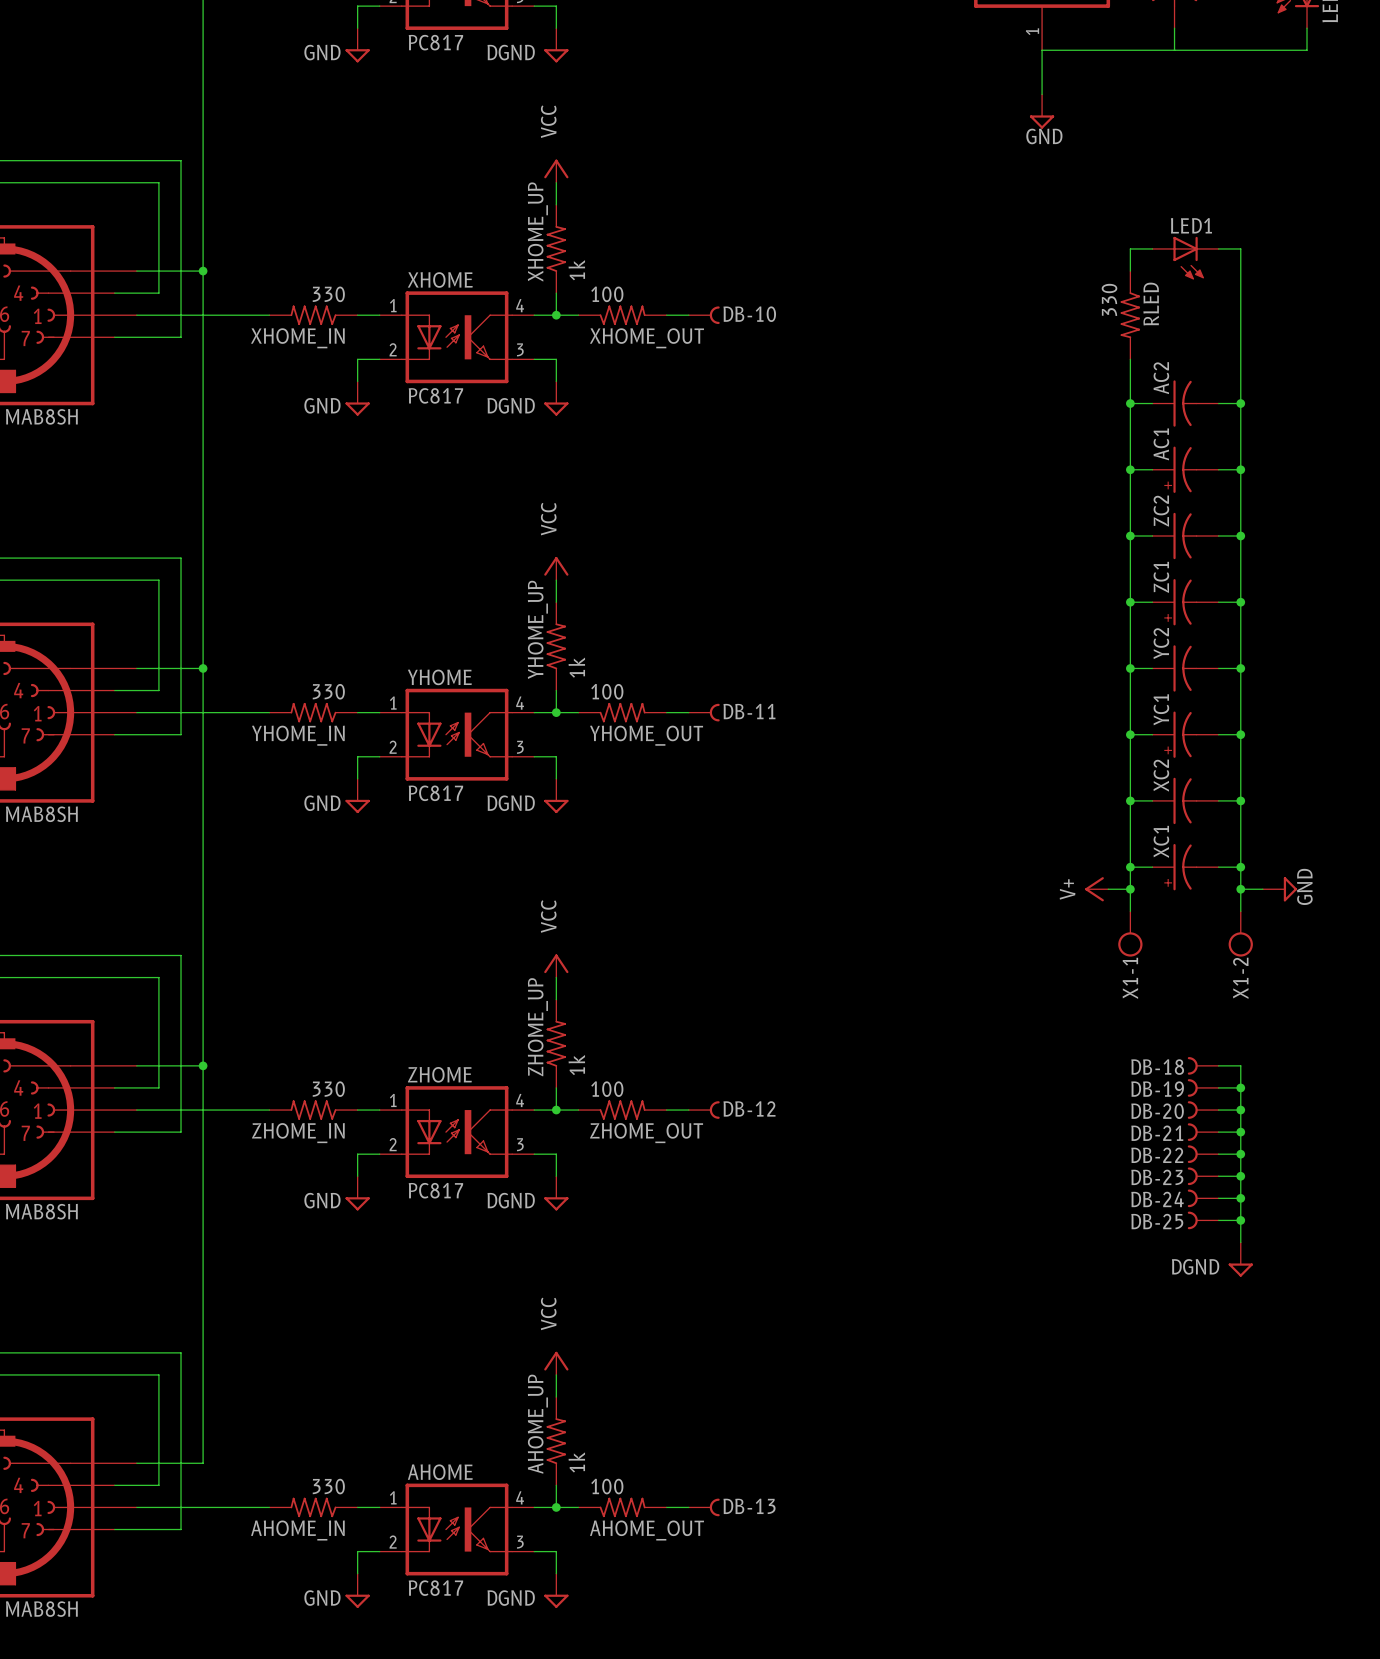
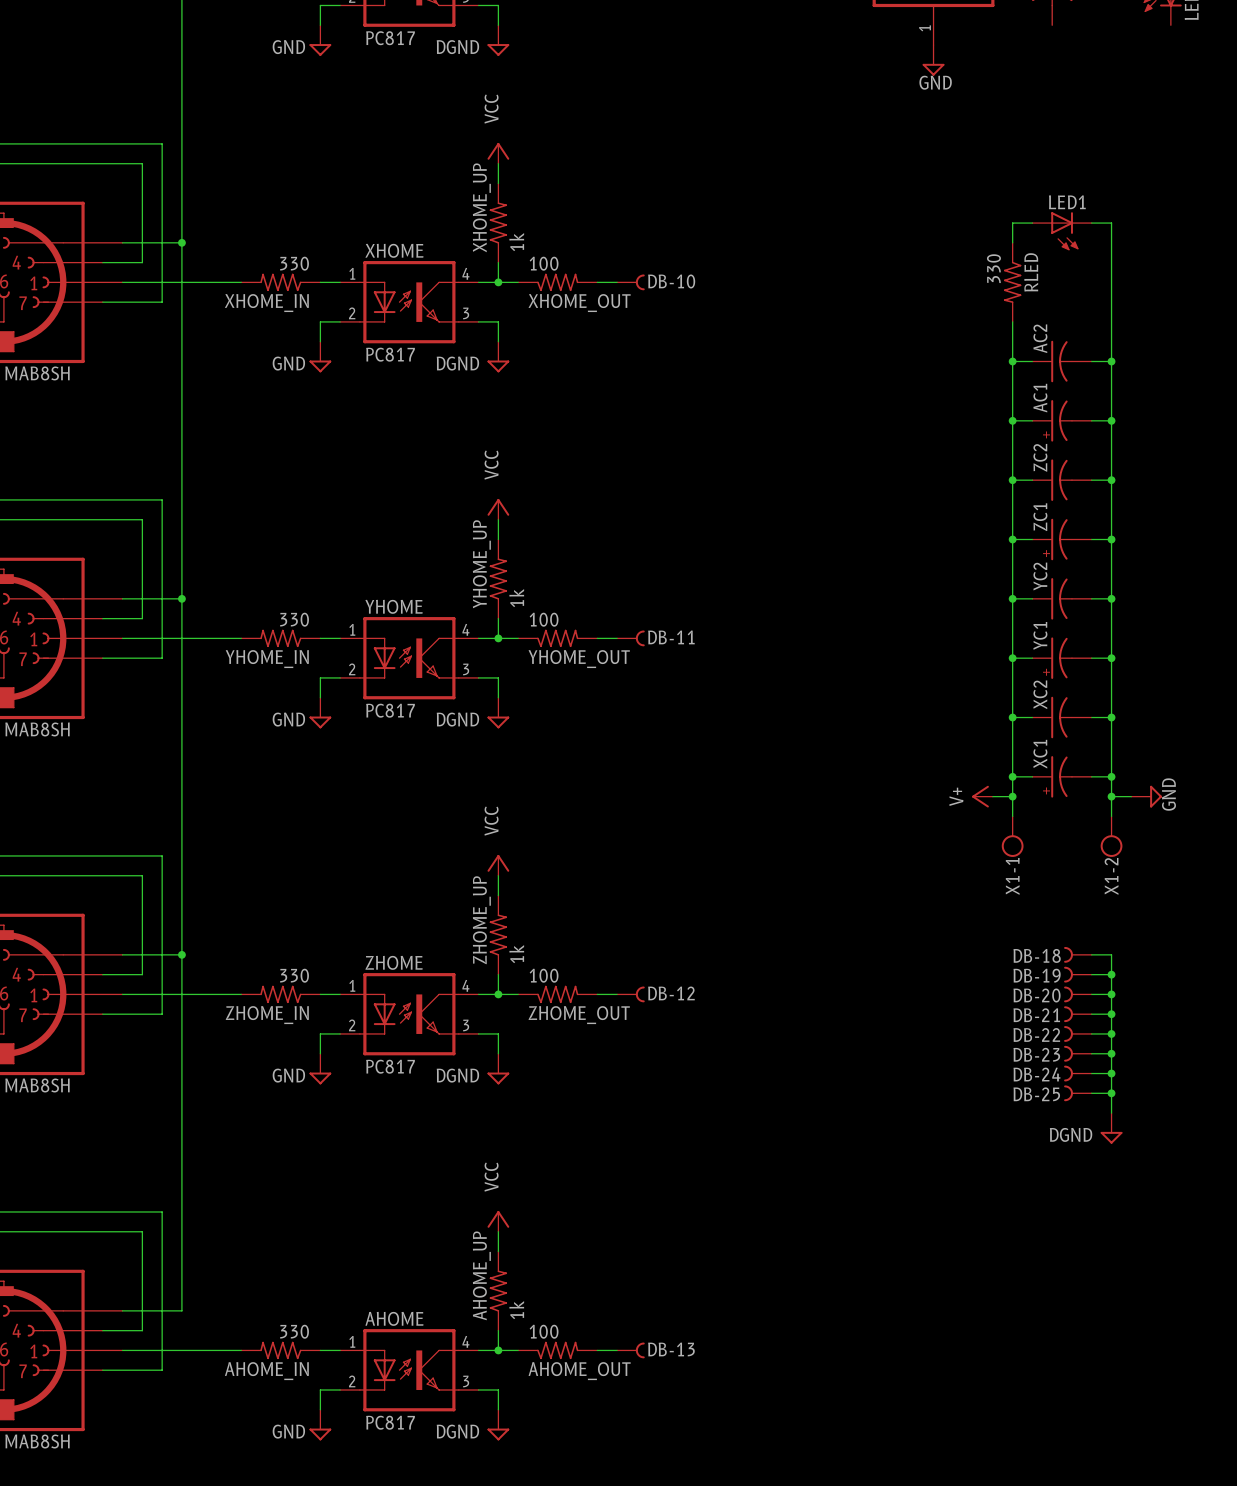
wire: (1174, 28) (1174, 50) -> none
wire: (1307, 28) (1307, 50) (1042, 50) (1042, 94) -> none
power symbol position: GND (1042, 111) -> GND (933, 60)

